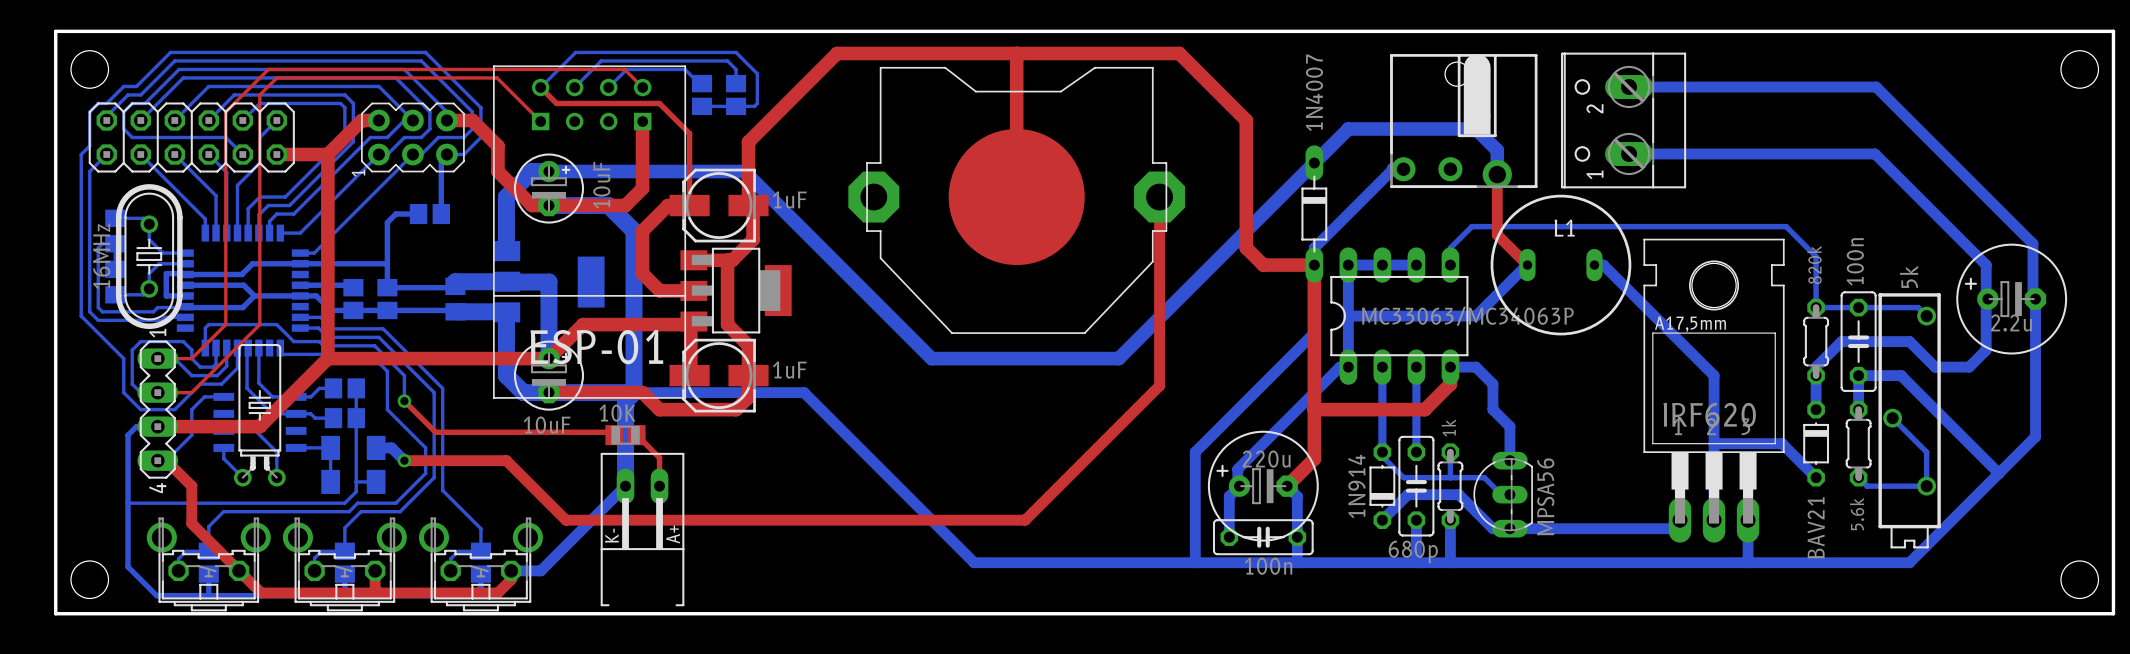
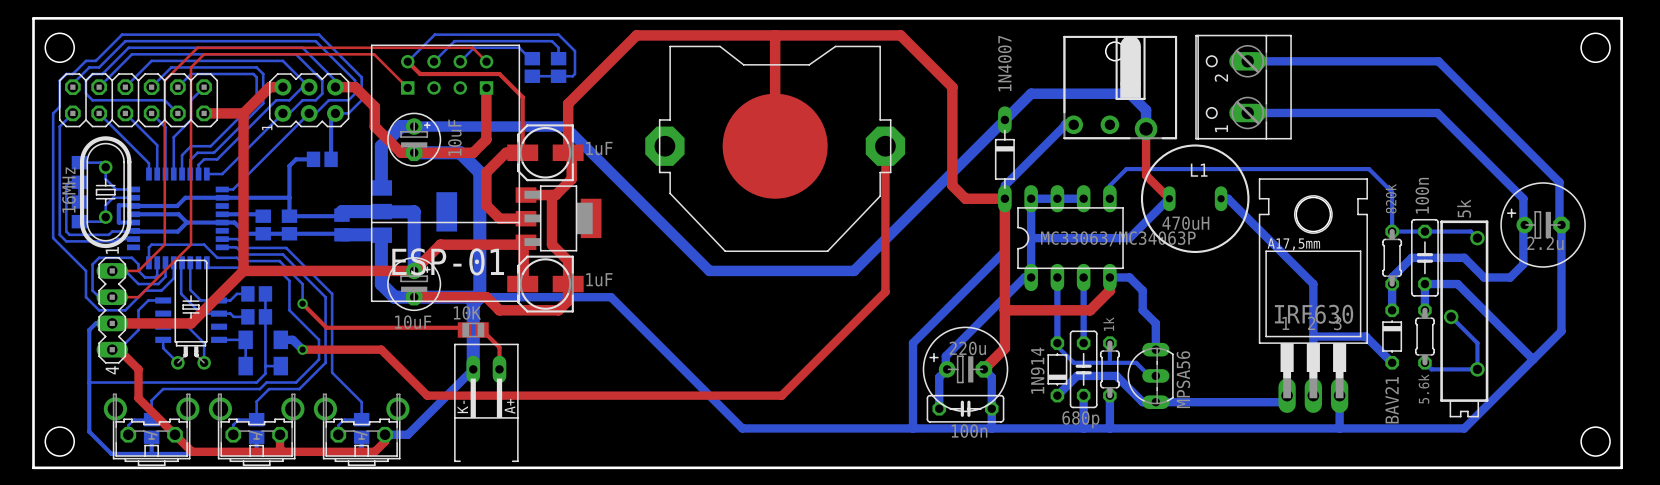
L1 value: none -> 470uH (1185, 223)
part value: IRF620 (1709, 414) -> IRF630 (1314, 314)

